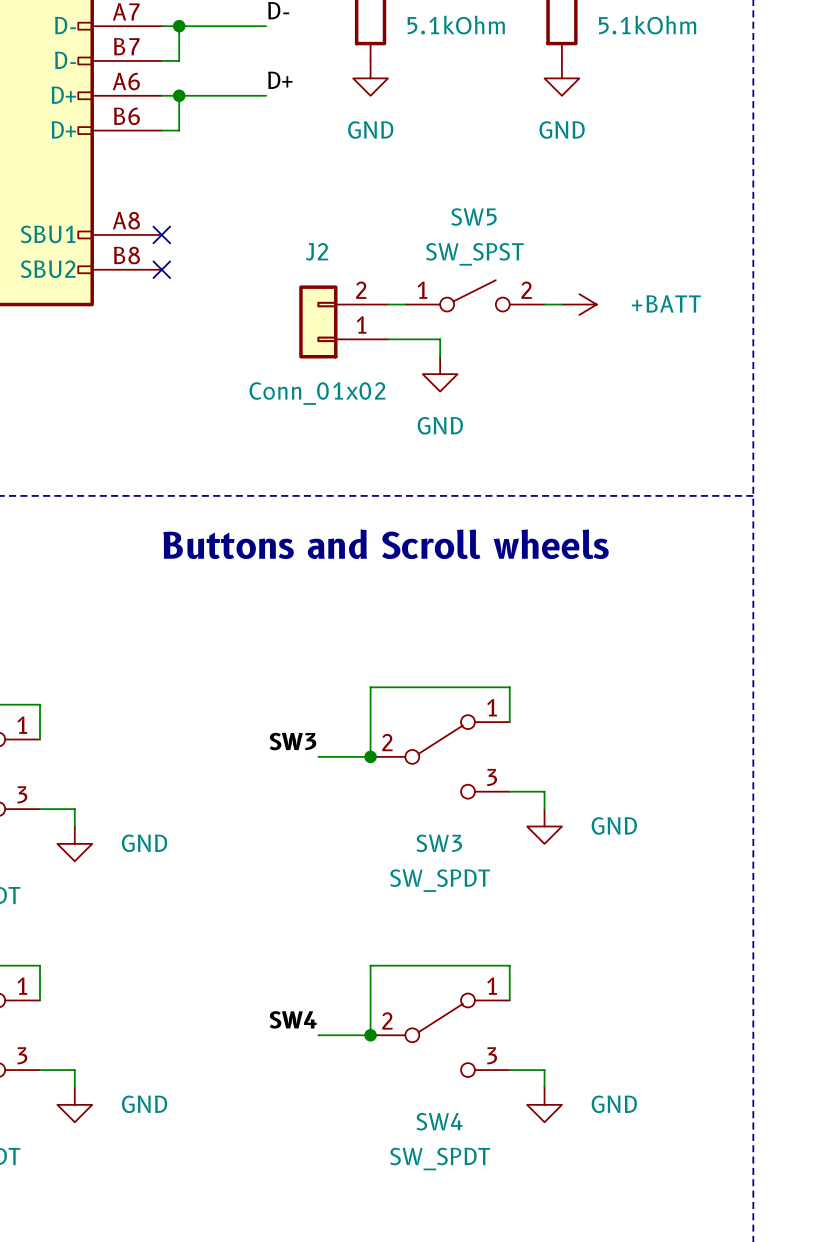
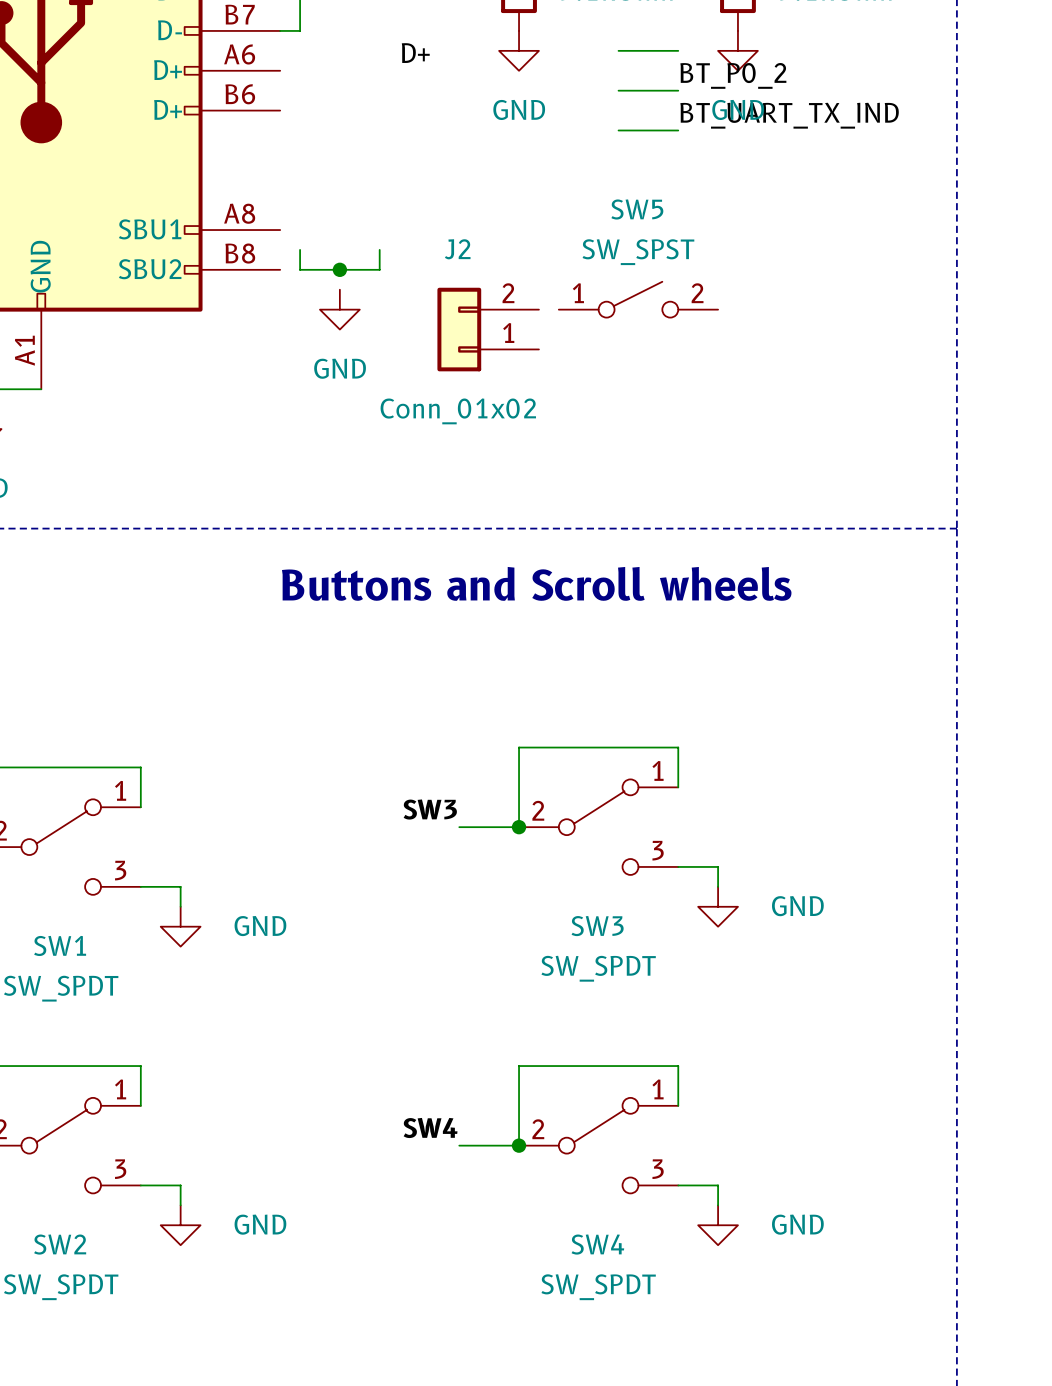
wire: none -> (618, 50) (678, 50)
wire: (161, 95) (266, 95) -> none
wire: (179, 95) (179, 130) (161, 130) -> none
junction: (179, 95) -> none
label: none -> BT_P0_2 (733, 75)
wire: none -> (618, 90) (678, 90)
label: none -> BT_UART_TX_IND (789, 115)
wire: none -> (618, 130) (678, 130)
no-connect mark: (161, 234) -> none
wire: none -> (300, 249) (300, 269) (379, 269) (379, 249)
no-connect mark: (161, 269) -> none
junction: none -> (339, 269)
wire: (387, 304) (405, 304) -> none
wire: (544, 304) (561, 304) -> none
power symbol: +BATT (579, 304) -> none
wire: (387, 339) (440, 339) (440, 356) -> none
power symbol position: GND (440, 374) -> GND (339, 309)

